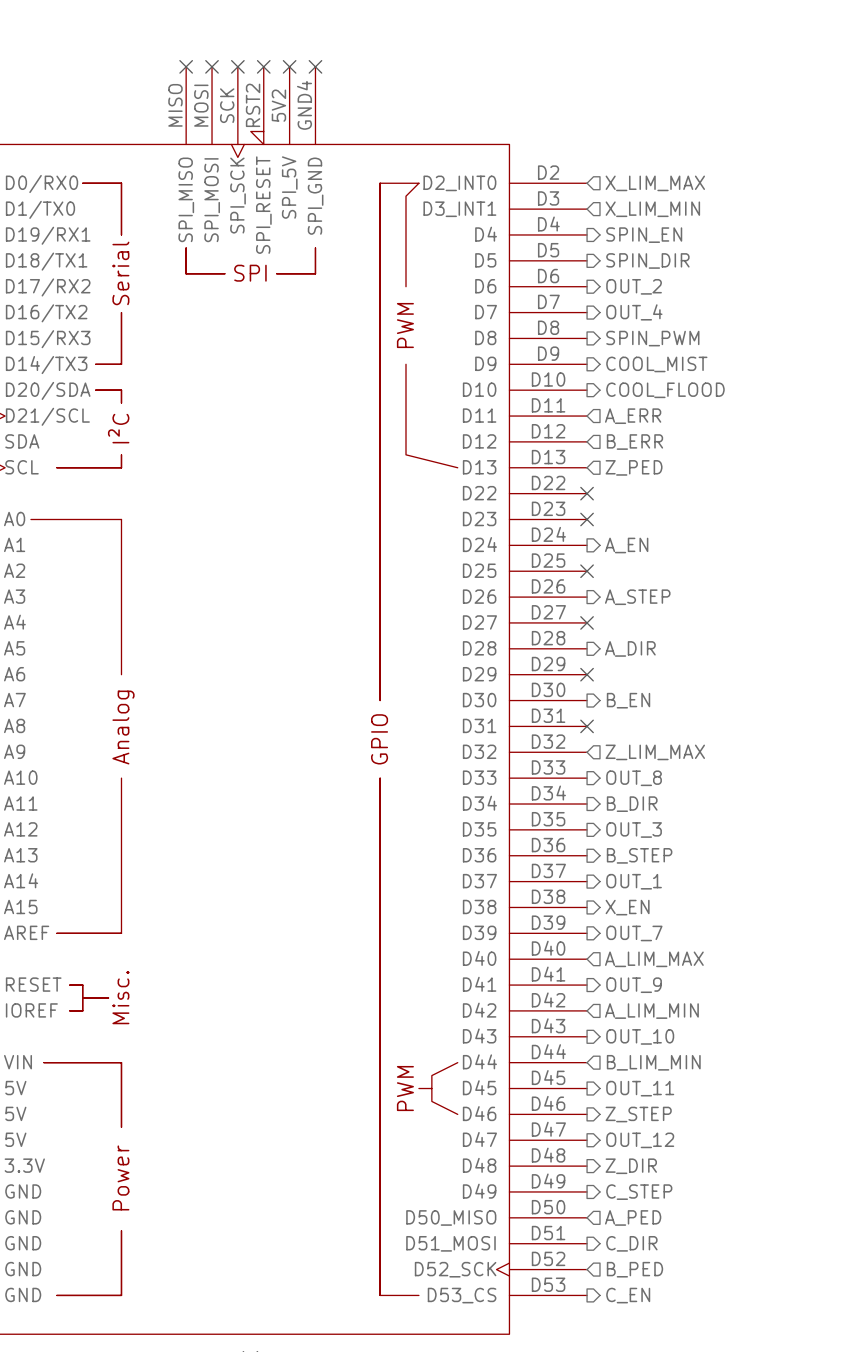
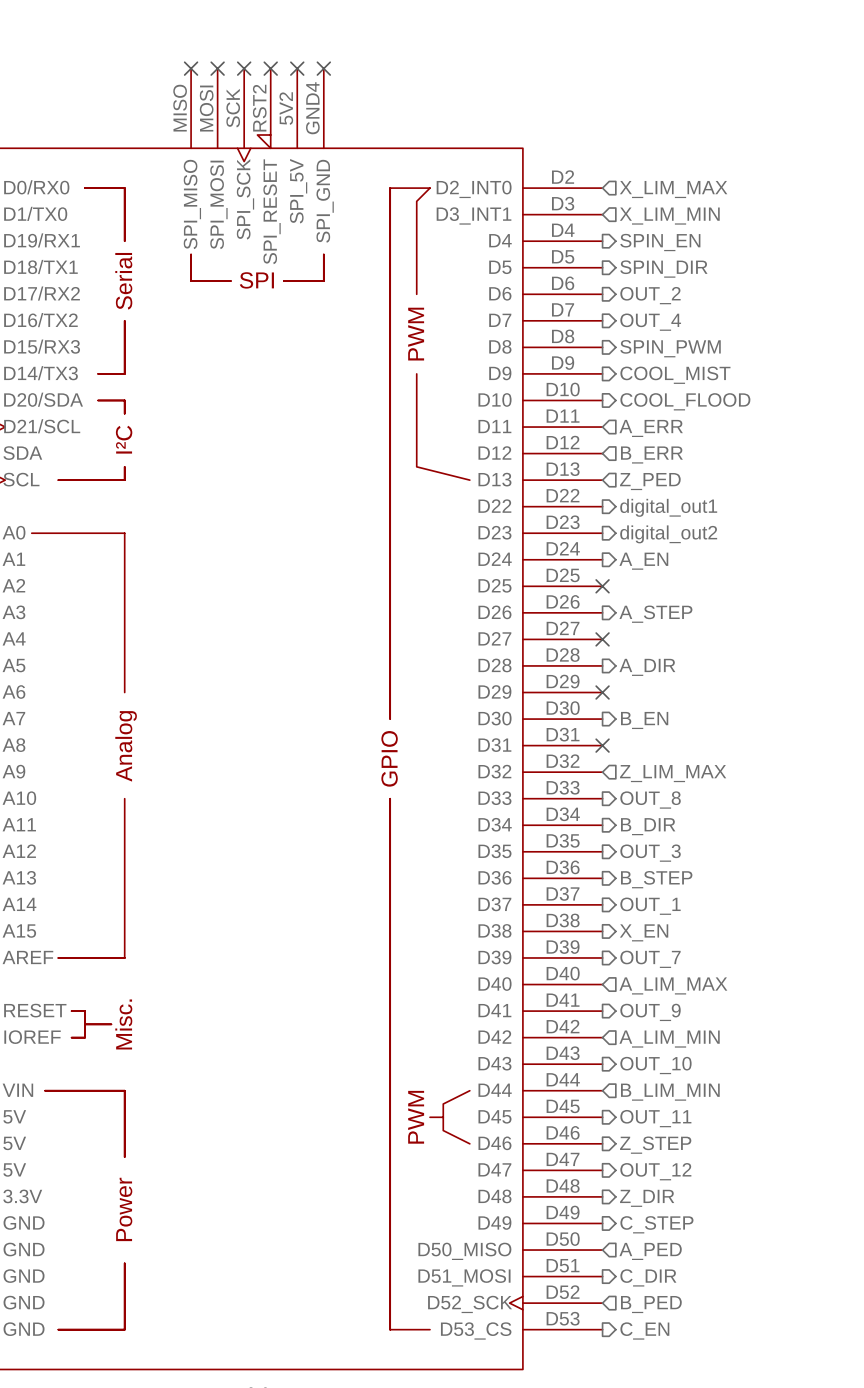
no-connect mark: (587, 493) -> none
hierarchical label: none -> digital_out1 (668, 507)
no-connect mark: (587, 519) -> none
hierarchical label: none -> digital_out2 (668, 534)

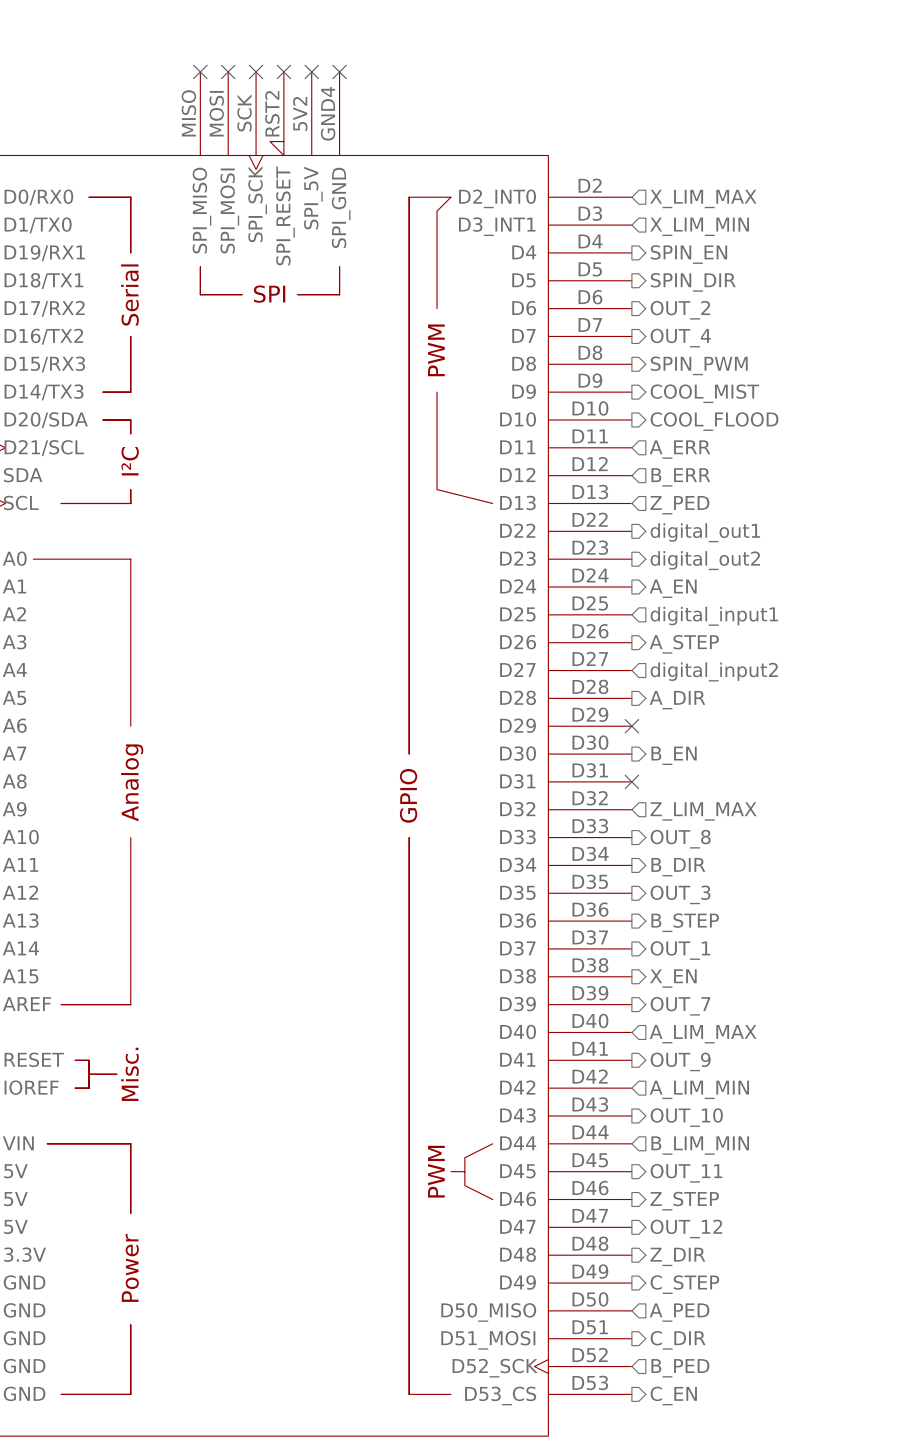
no-connect mark: (602, 586) -> none
hierarchical label: none -> digital_input1 (714, 616)
no-connect mark: (602, 639) -> none
hierarchical label: none -> digital_input2 (714, 671)

